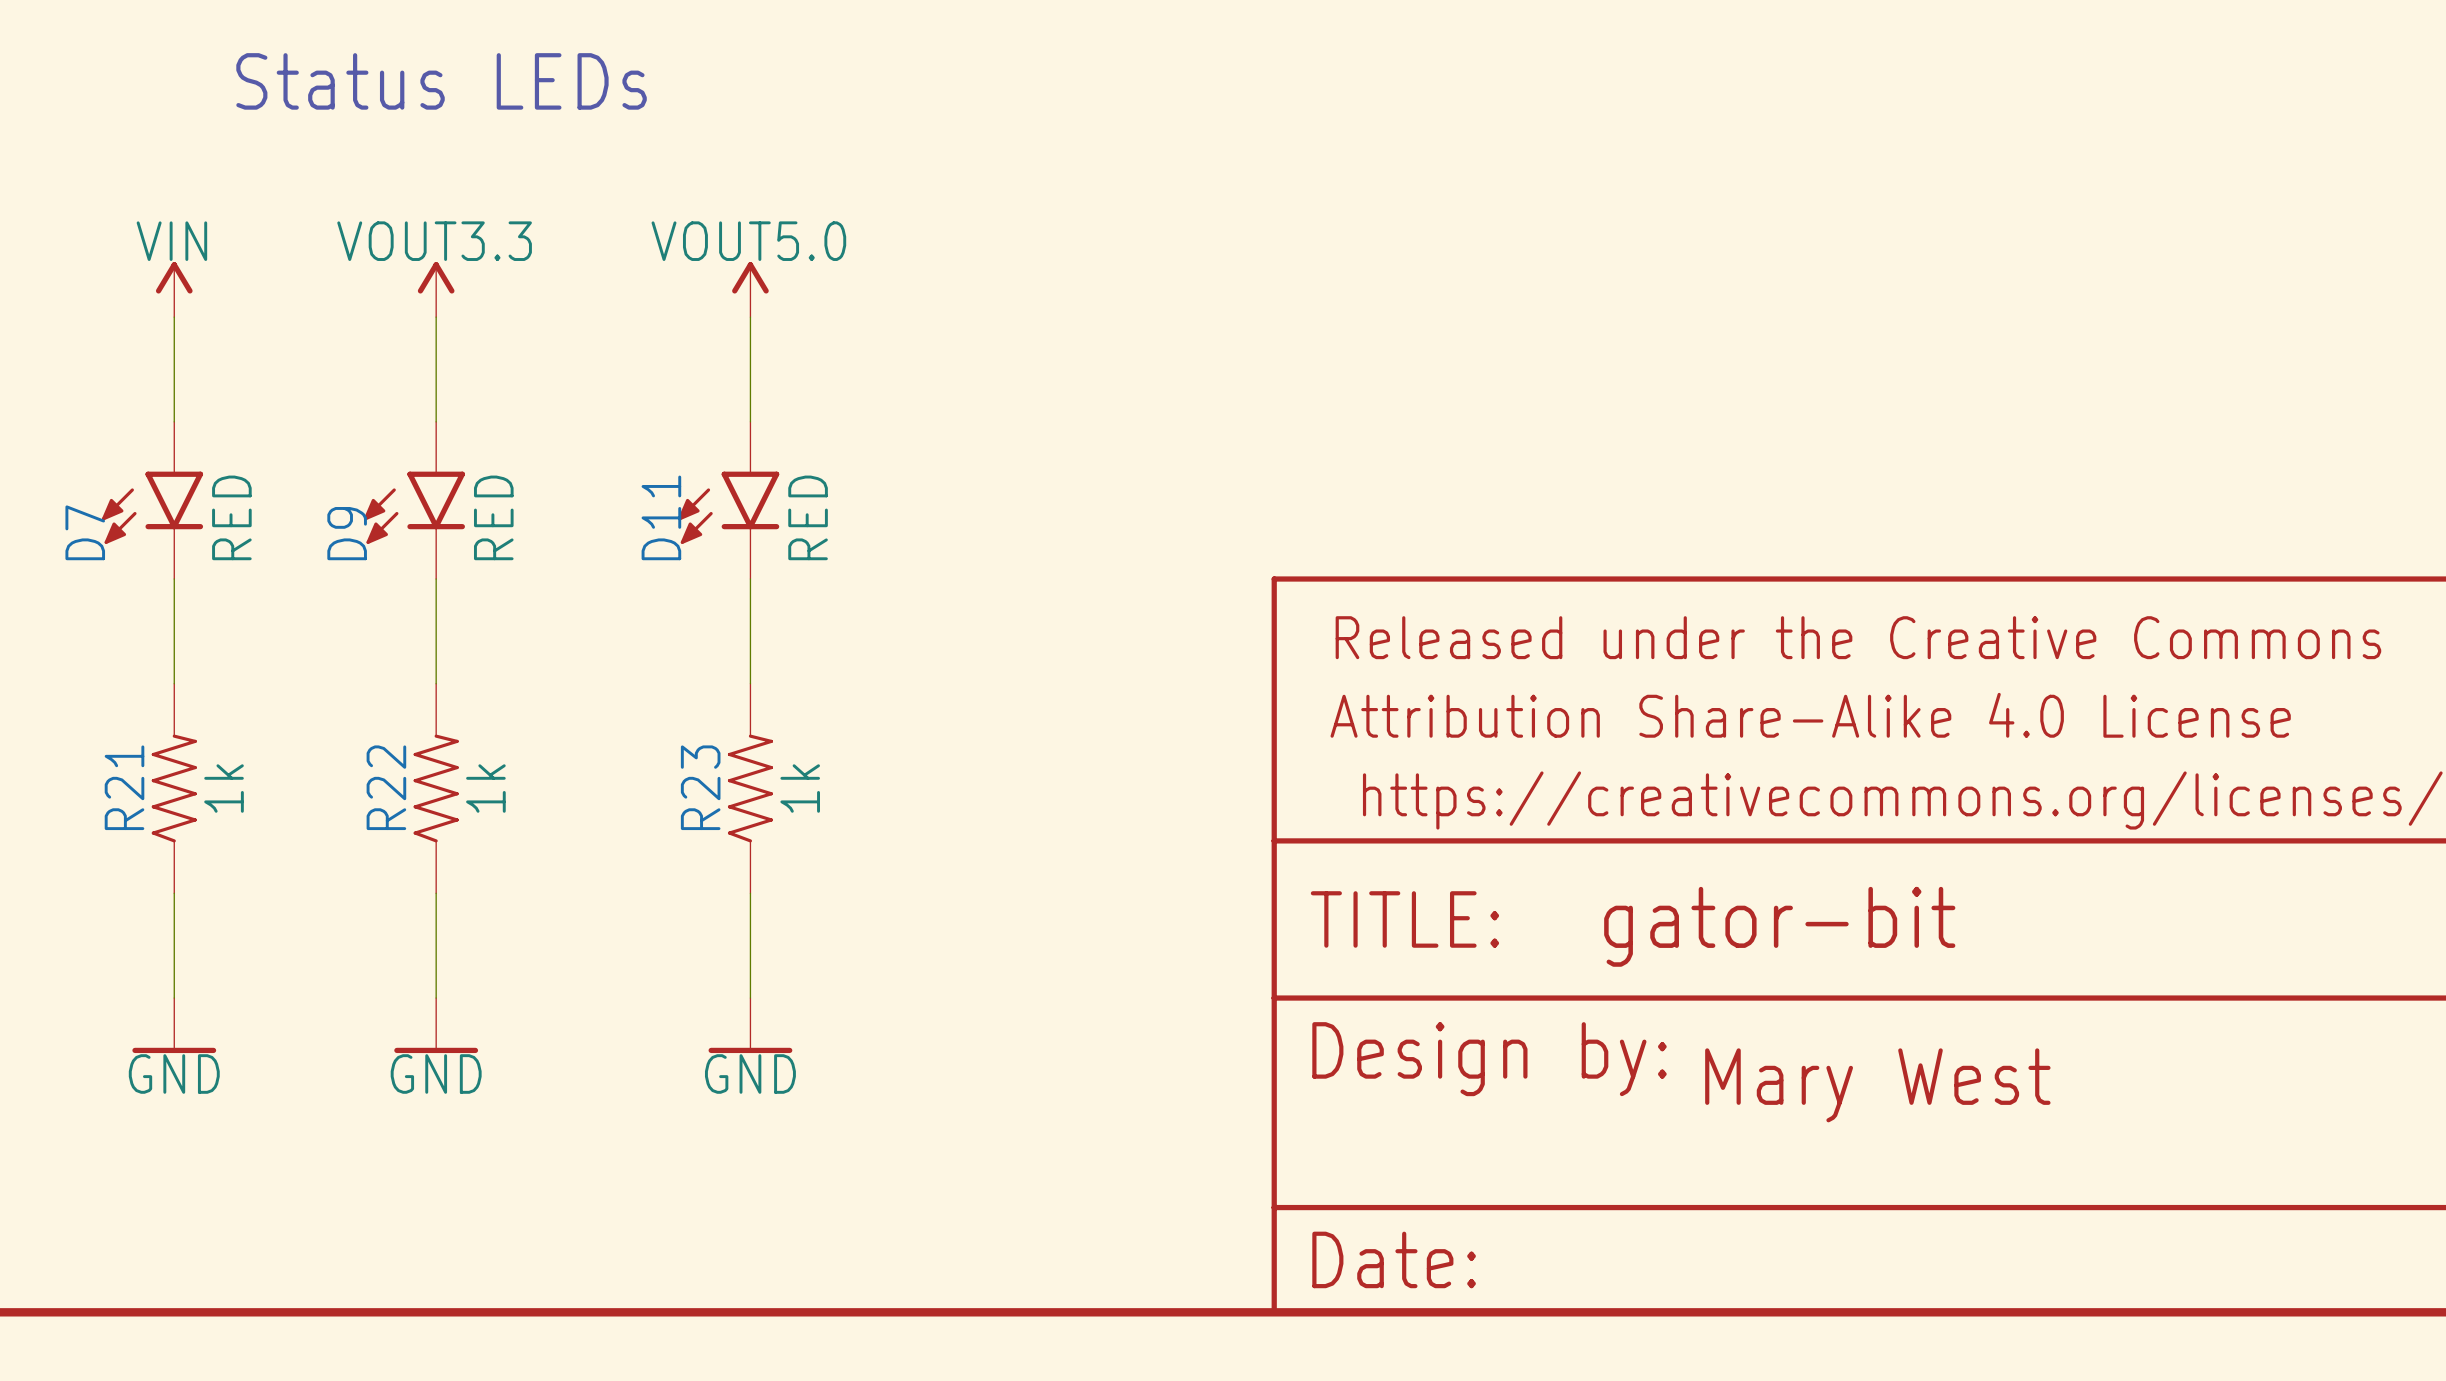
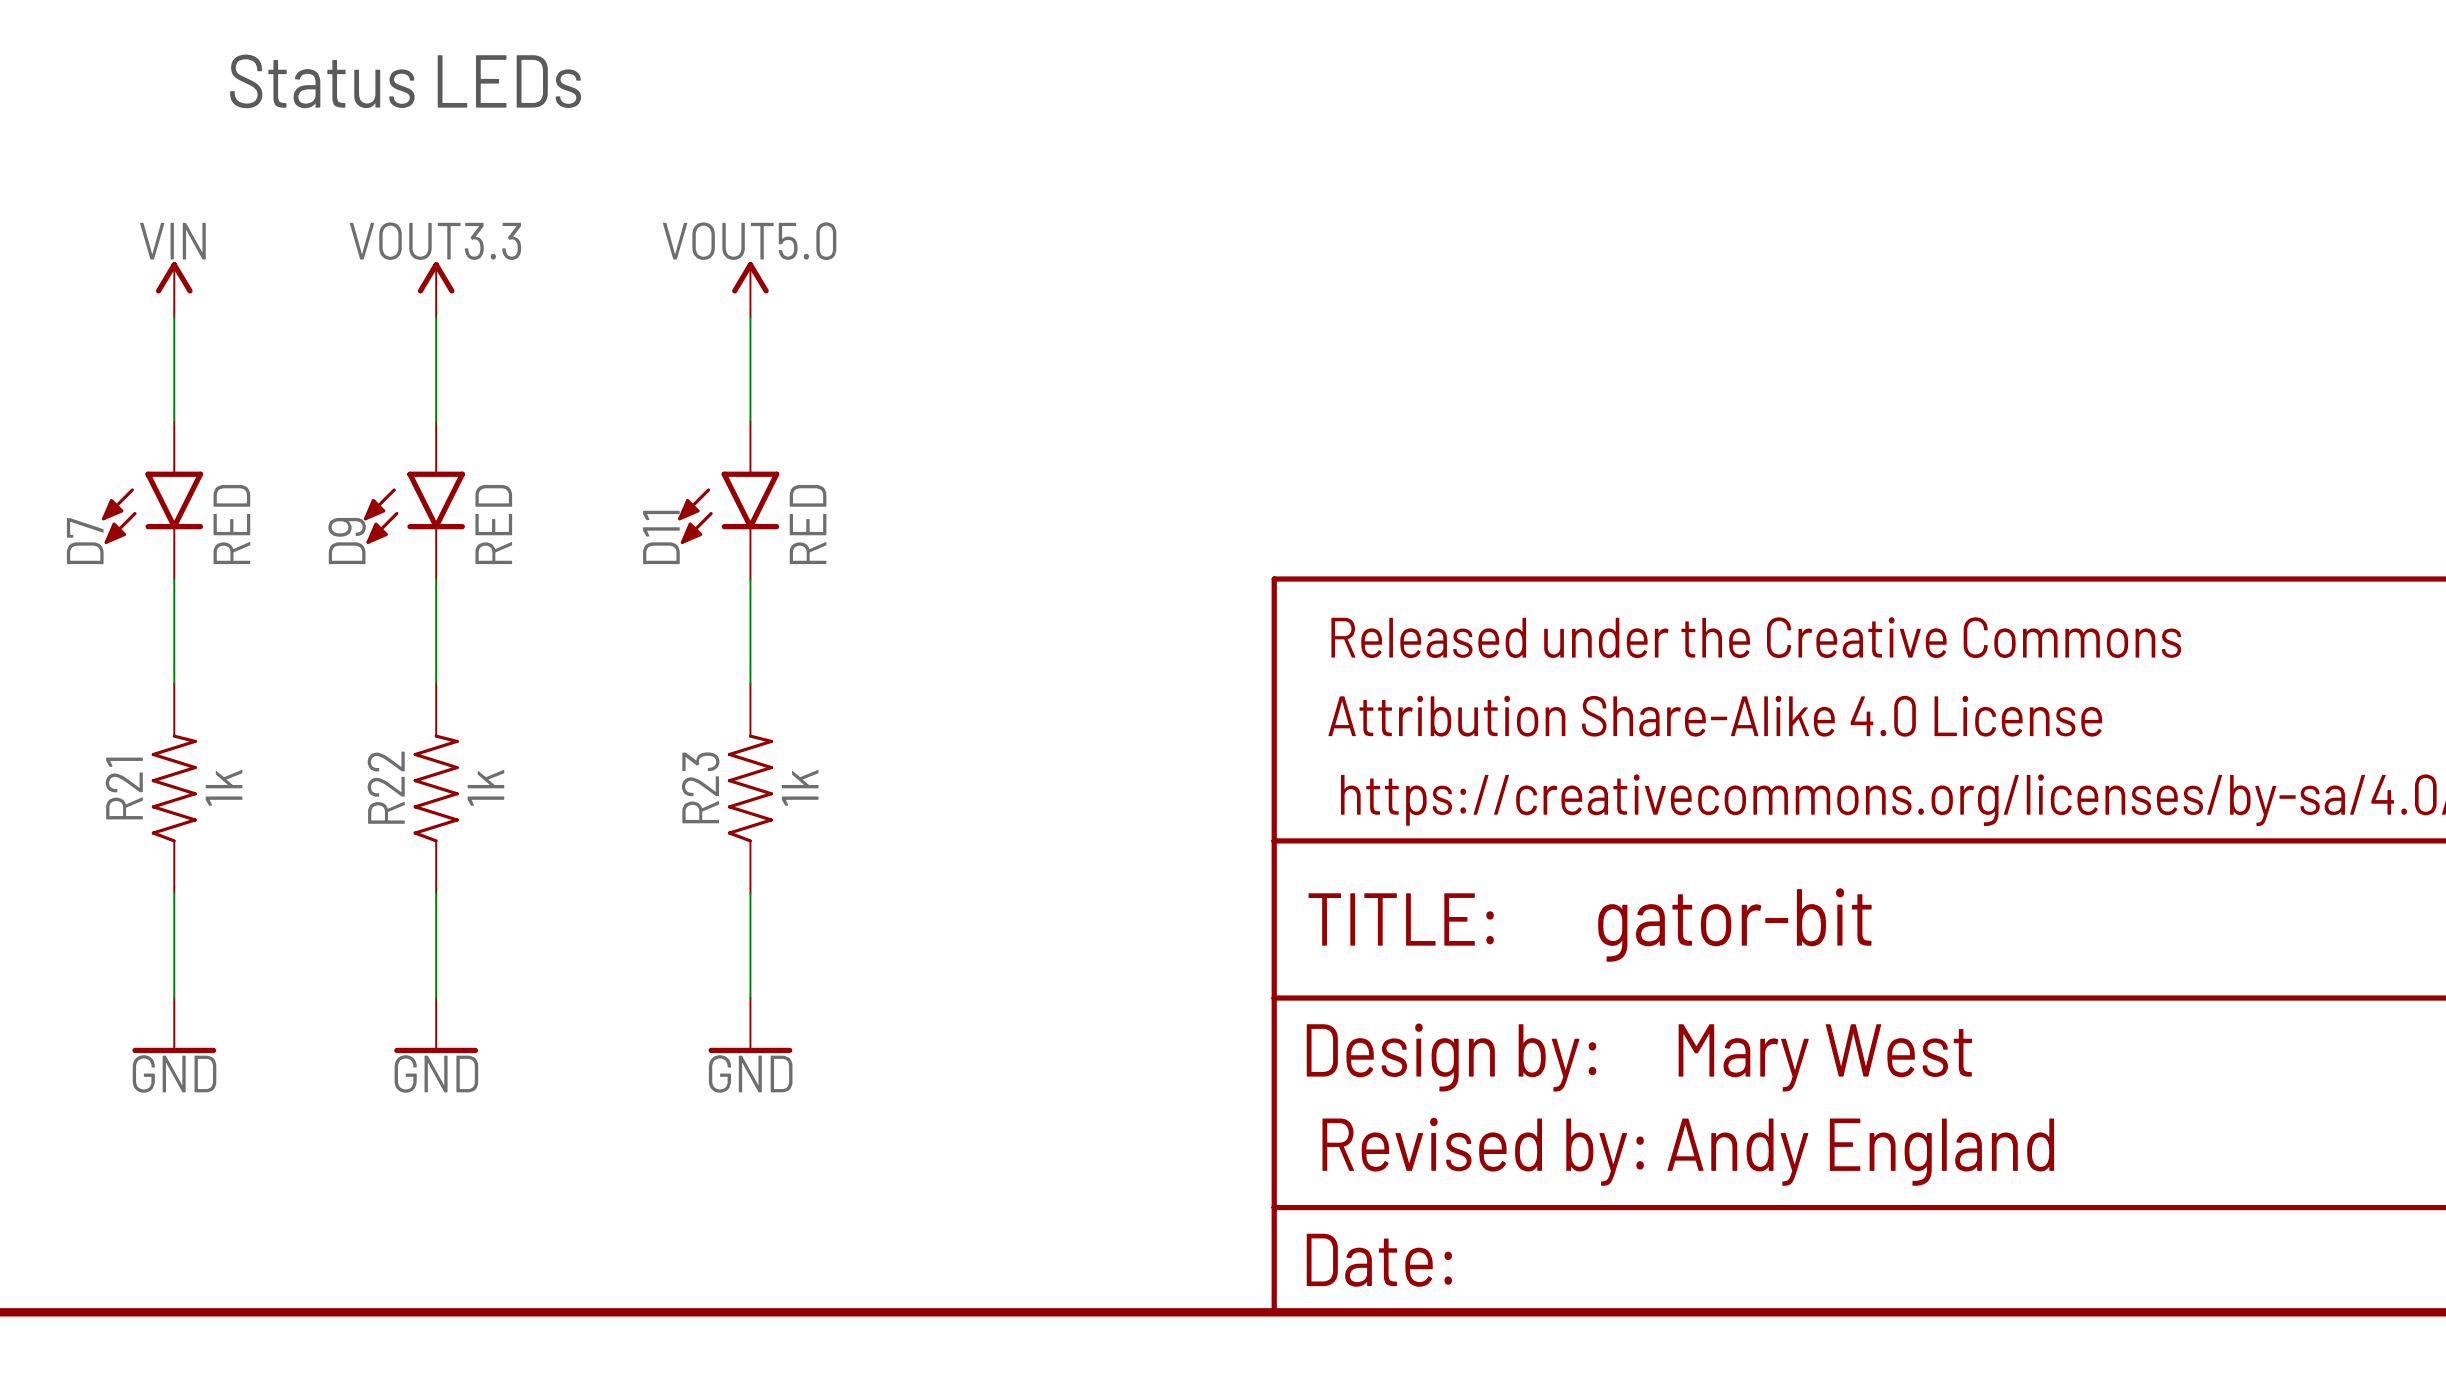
text position: Mary West (1877, 1085) -> Mary West (1825, 1057)
text: none -> Revised by: Andy England (1688, 1151)

